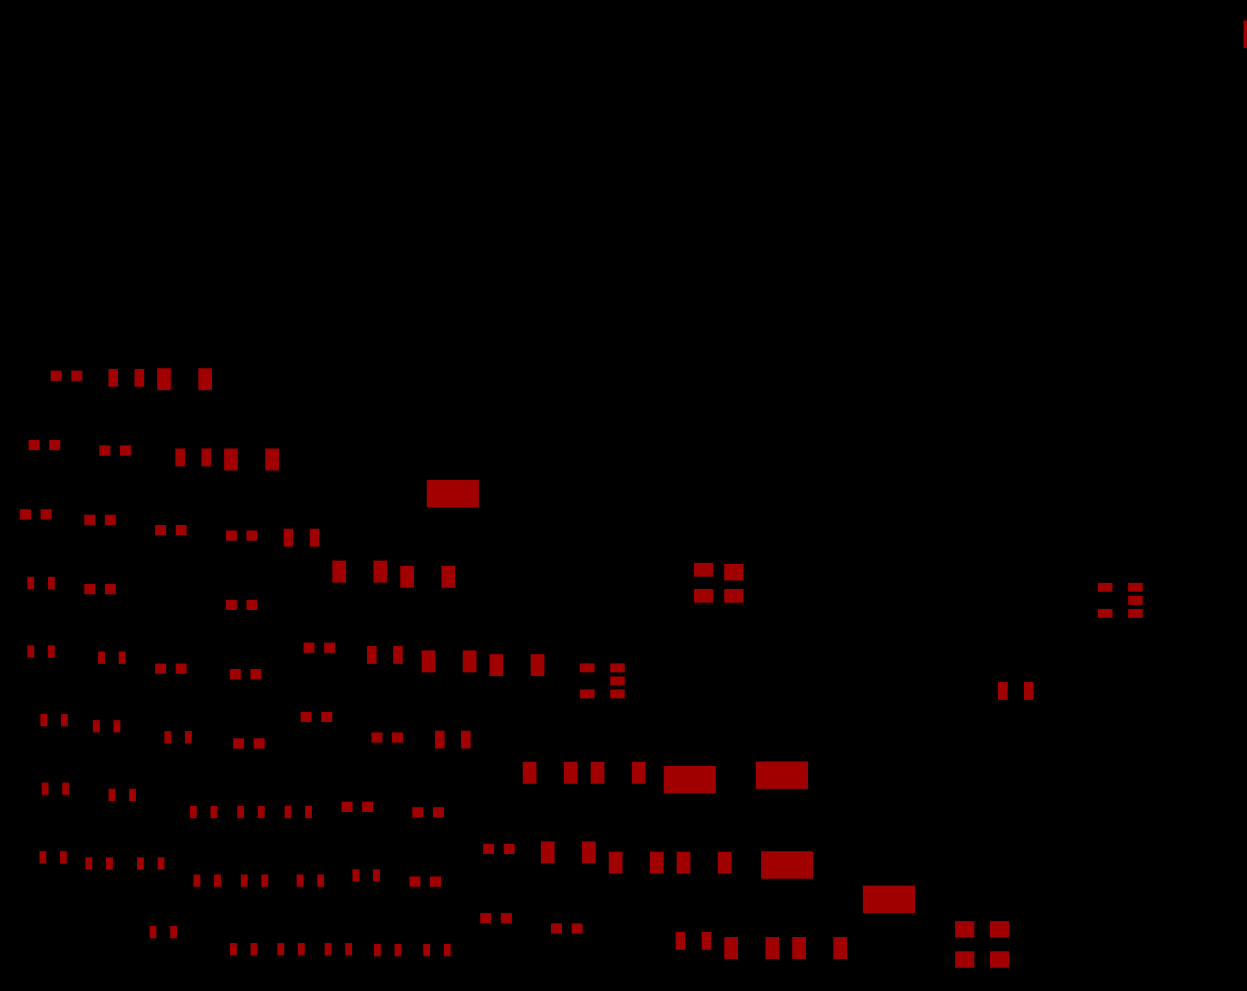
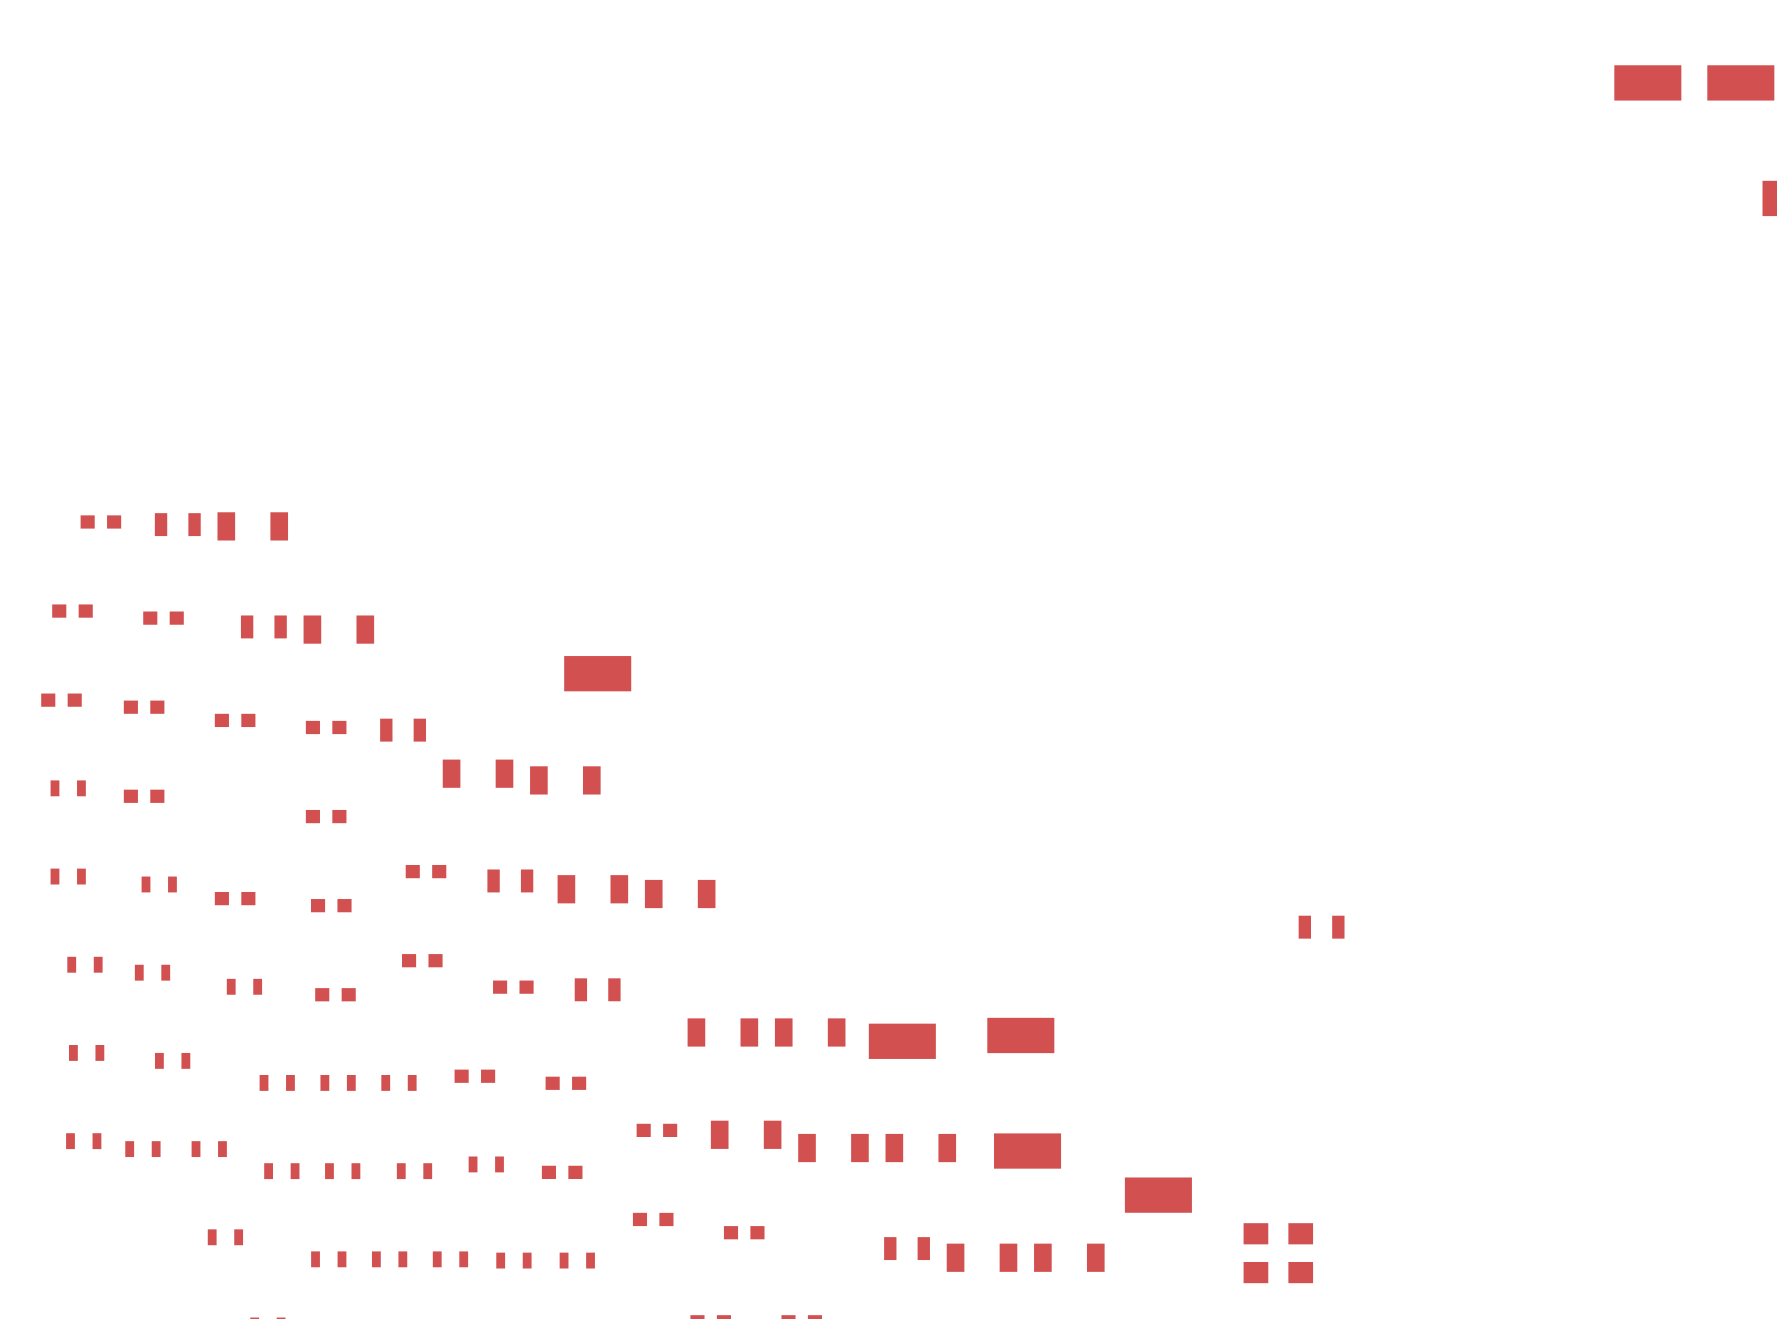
part: (718, 582) -> none
part: (1120, 600) -> none
part: (602, 680) -> none

